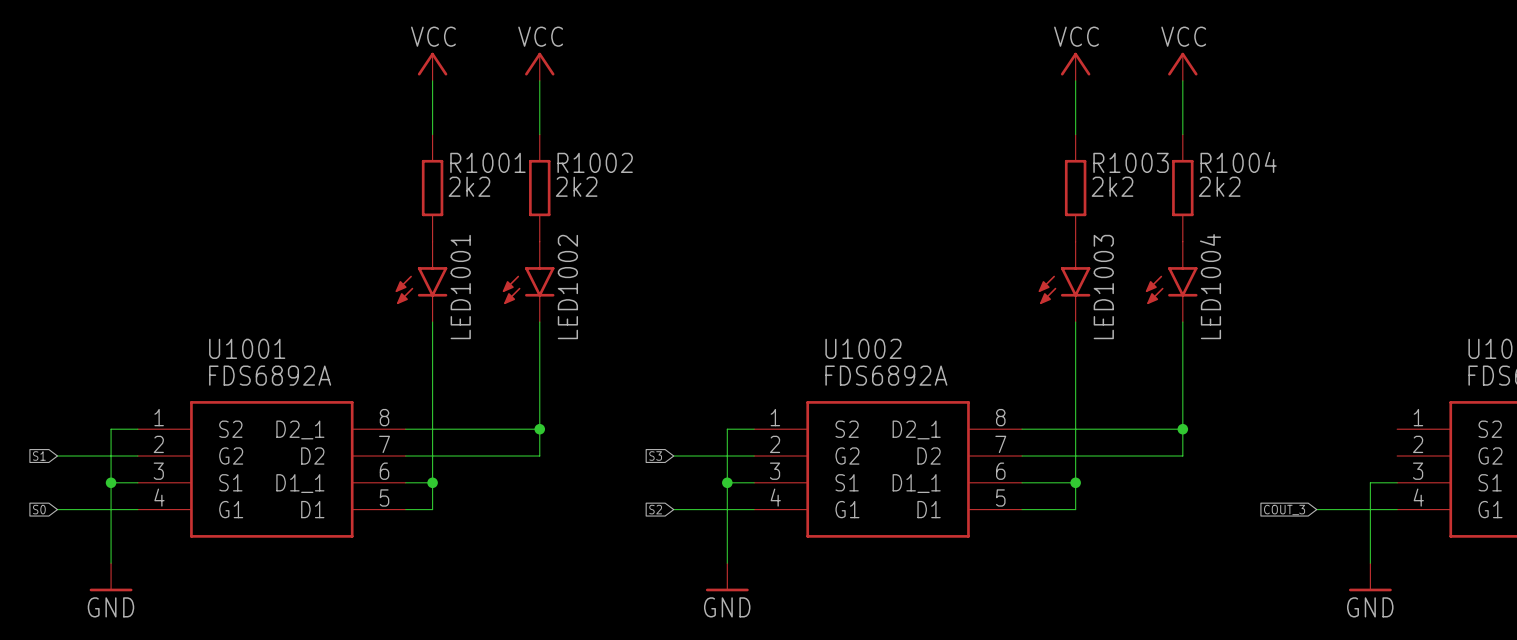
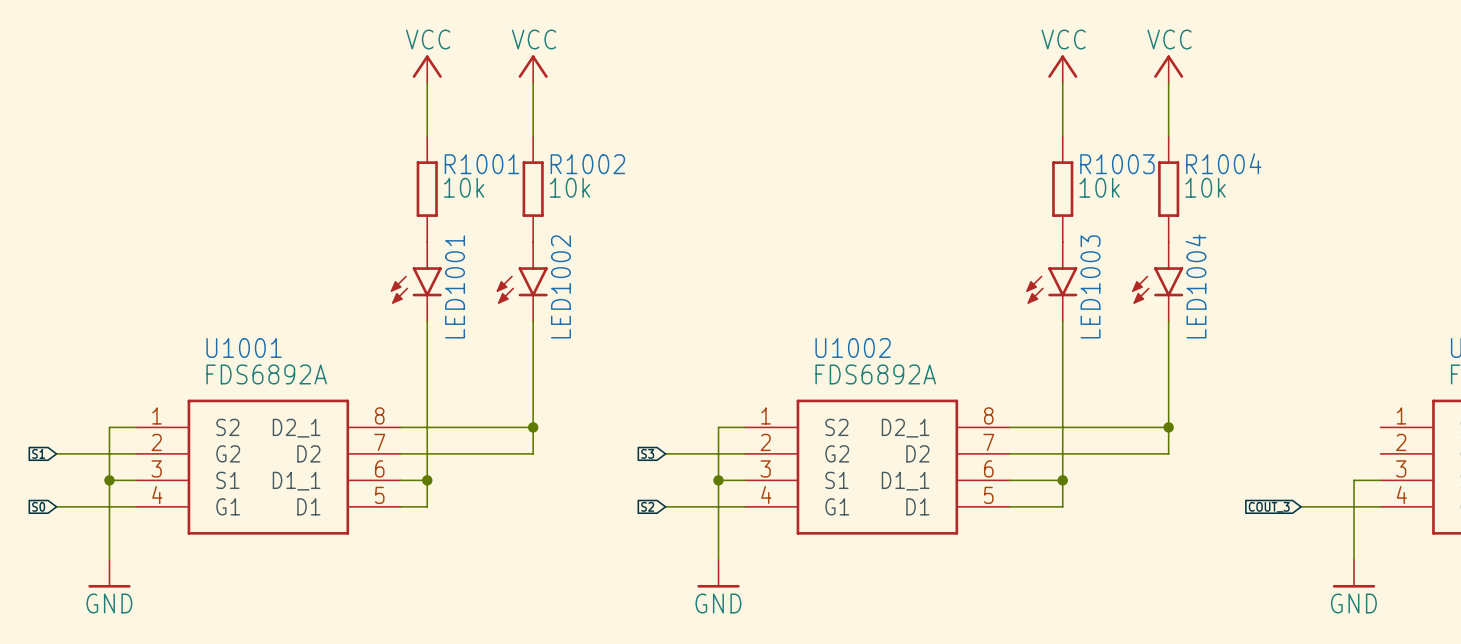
R1001 value: 2k2 (469, 186) -> 10k (464, 187)
R1002 value: 2k2 (576, 186) -> 10k (570, 187)
R1003 value: 2k2 (1112, 186) -> 10k (1099, 187)
R1004 value: 2k2 (1219, 186) -> 10k (1205, 187)

